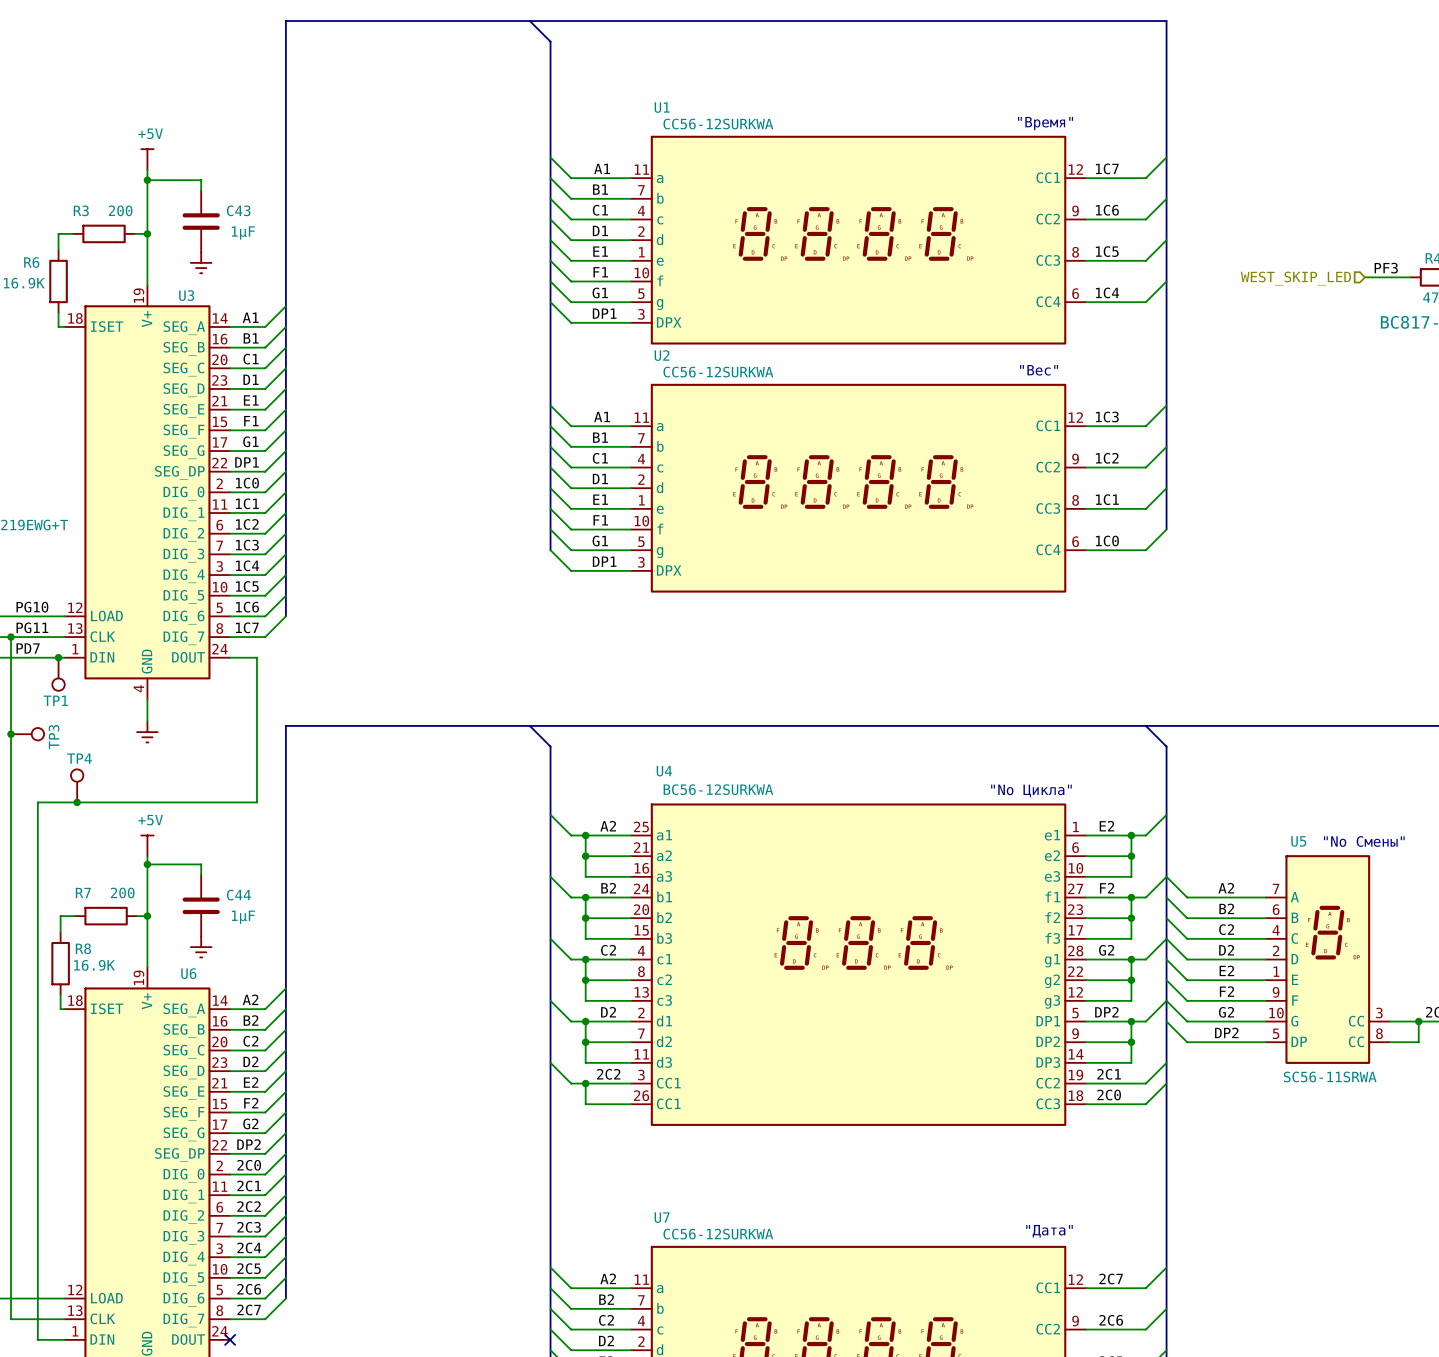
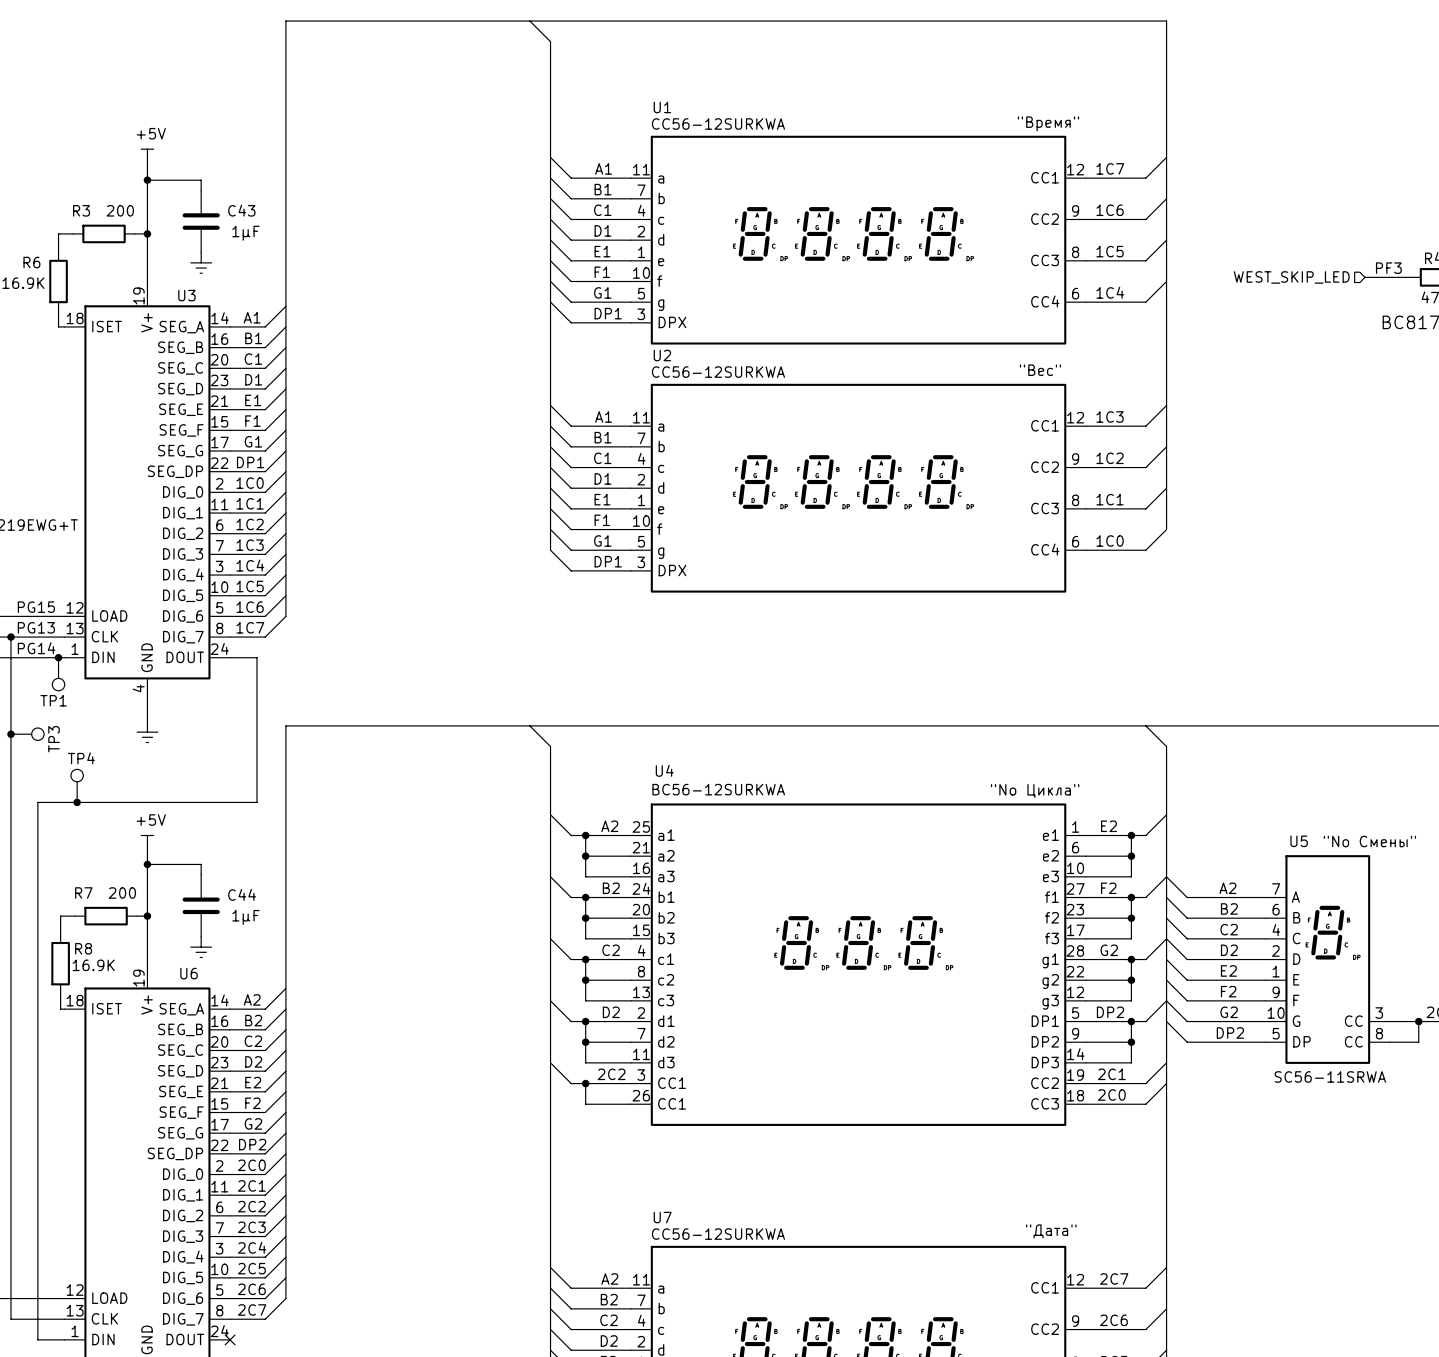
label: PG10 (32, 607) -> PG15 (36, 607)
label: PG11 (32, 627) -> PG13 (36, 627)
label: PD7 (28, 648) -> PG14 (36, 648)

